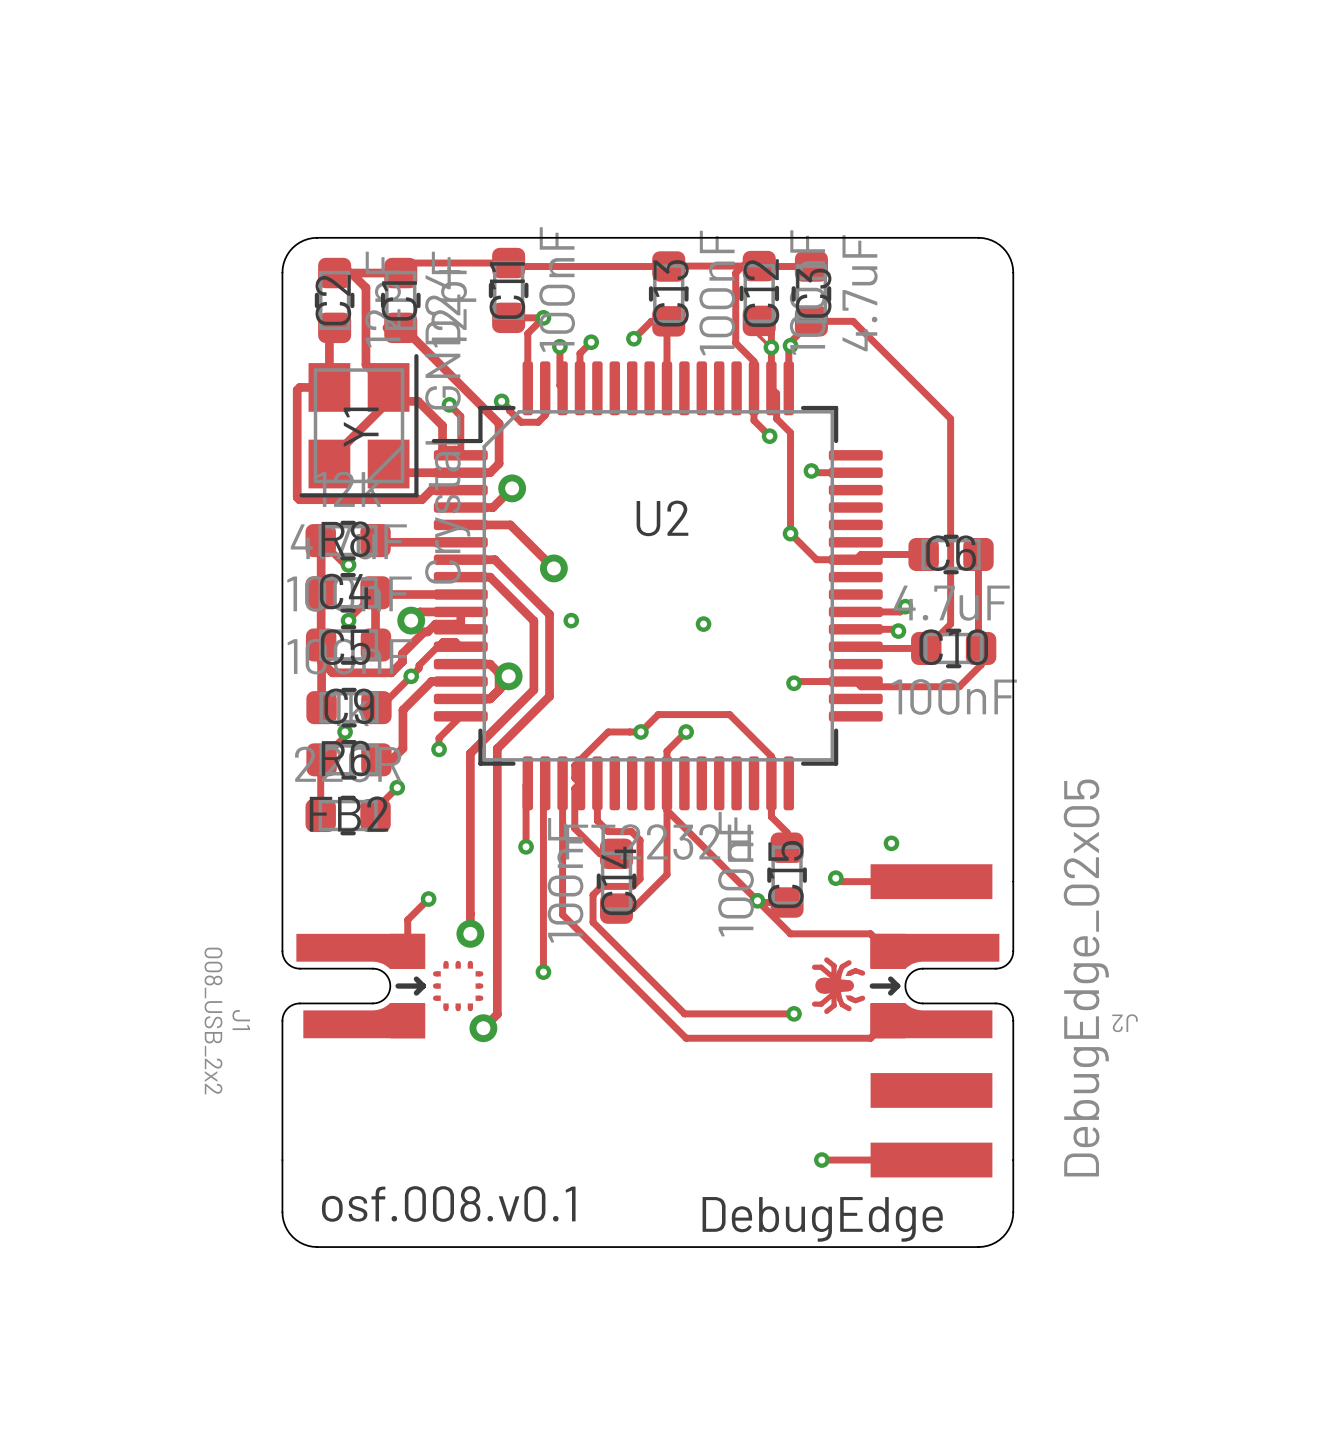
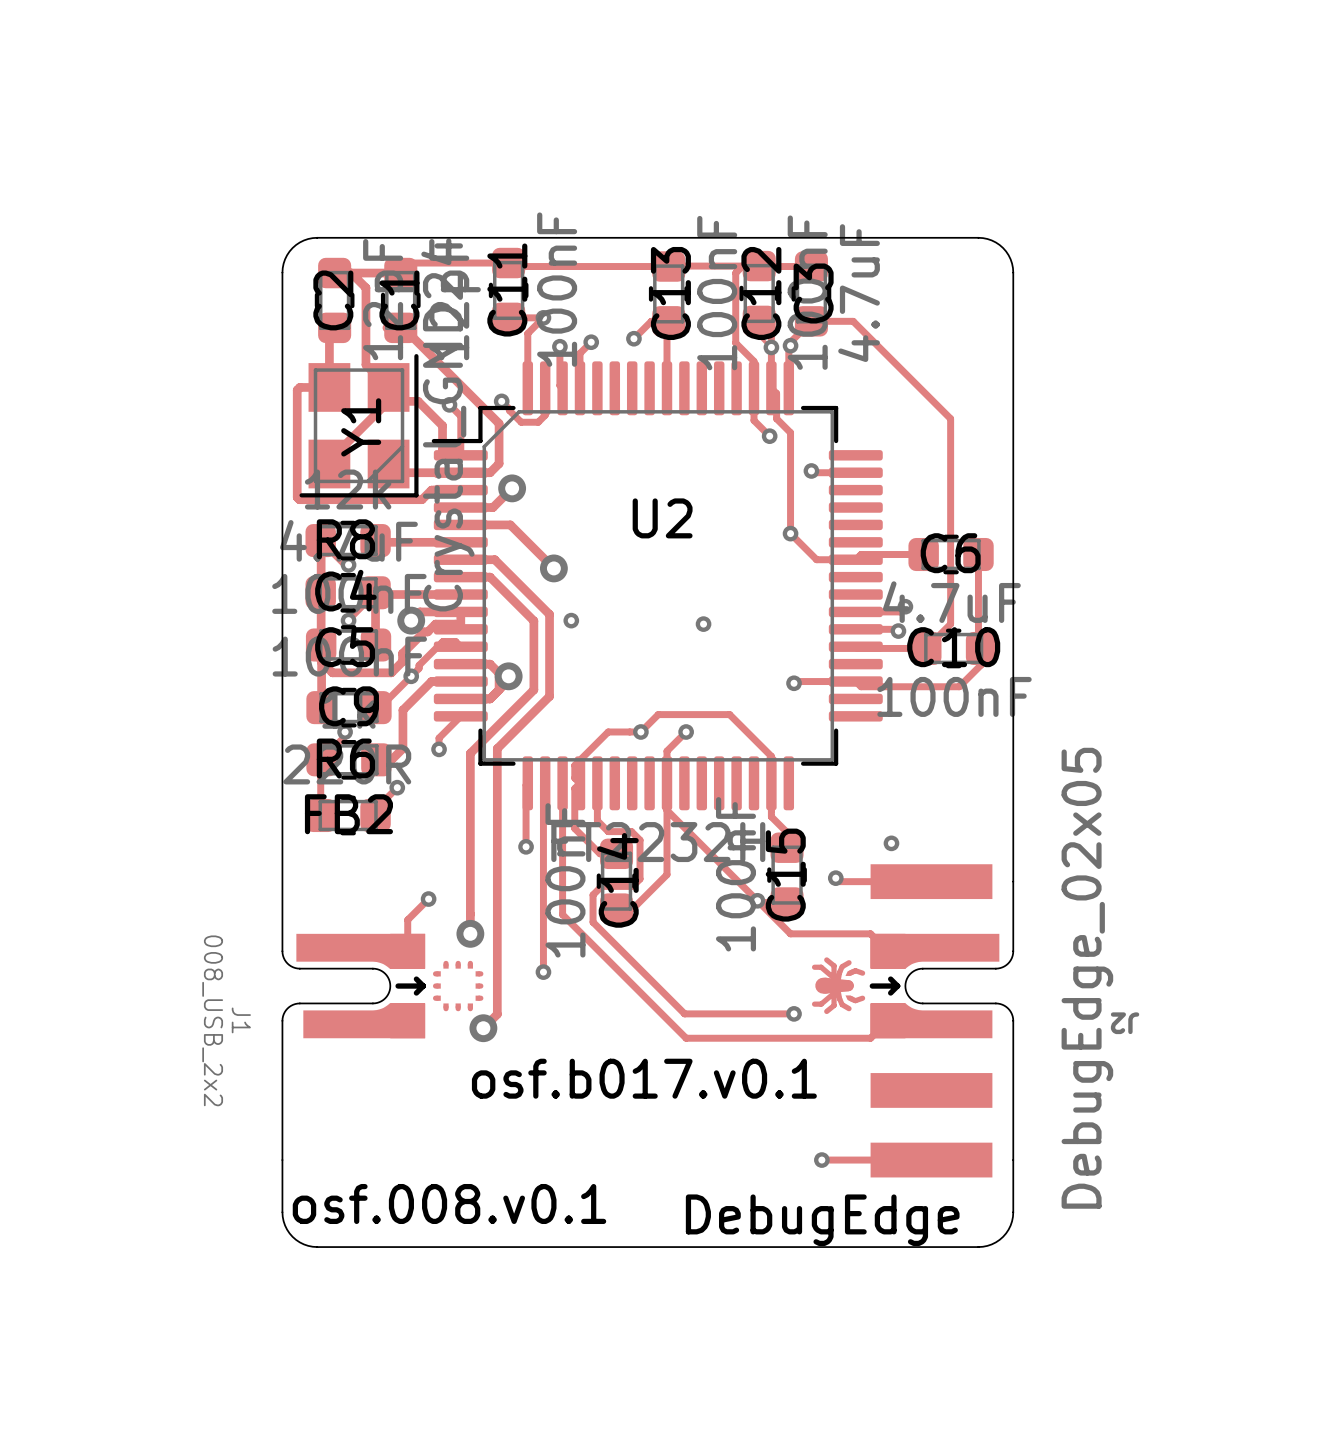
text: none -> osf.b017.v0.1 (644, 1078)

